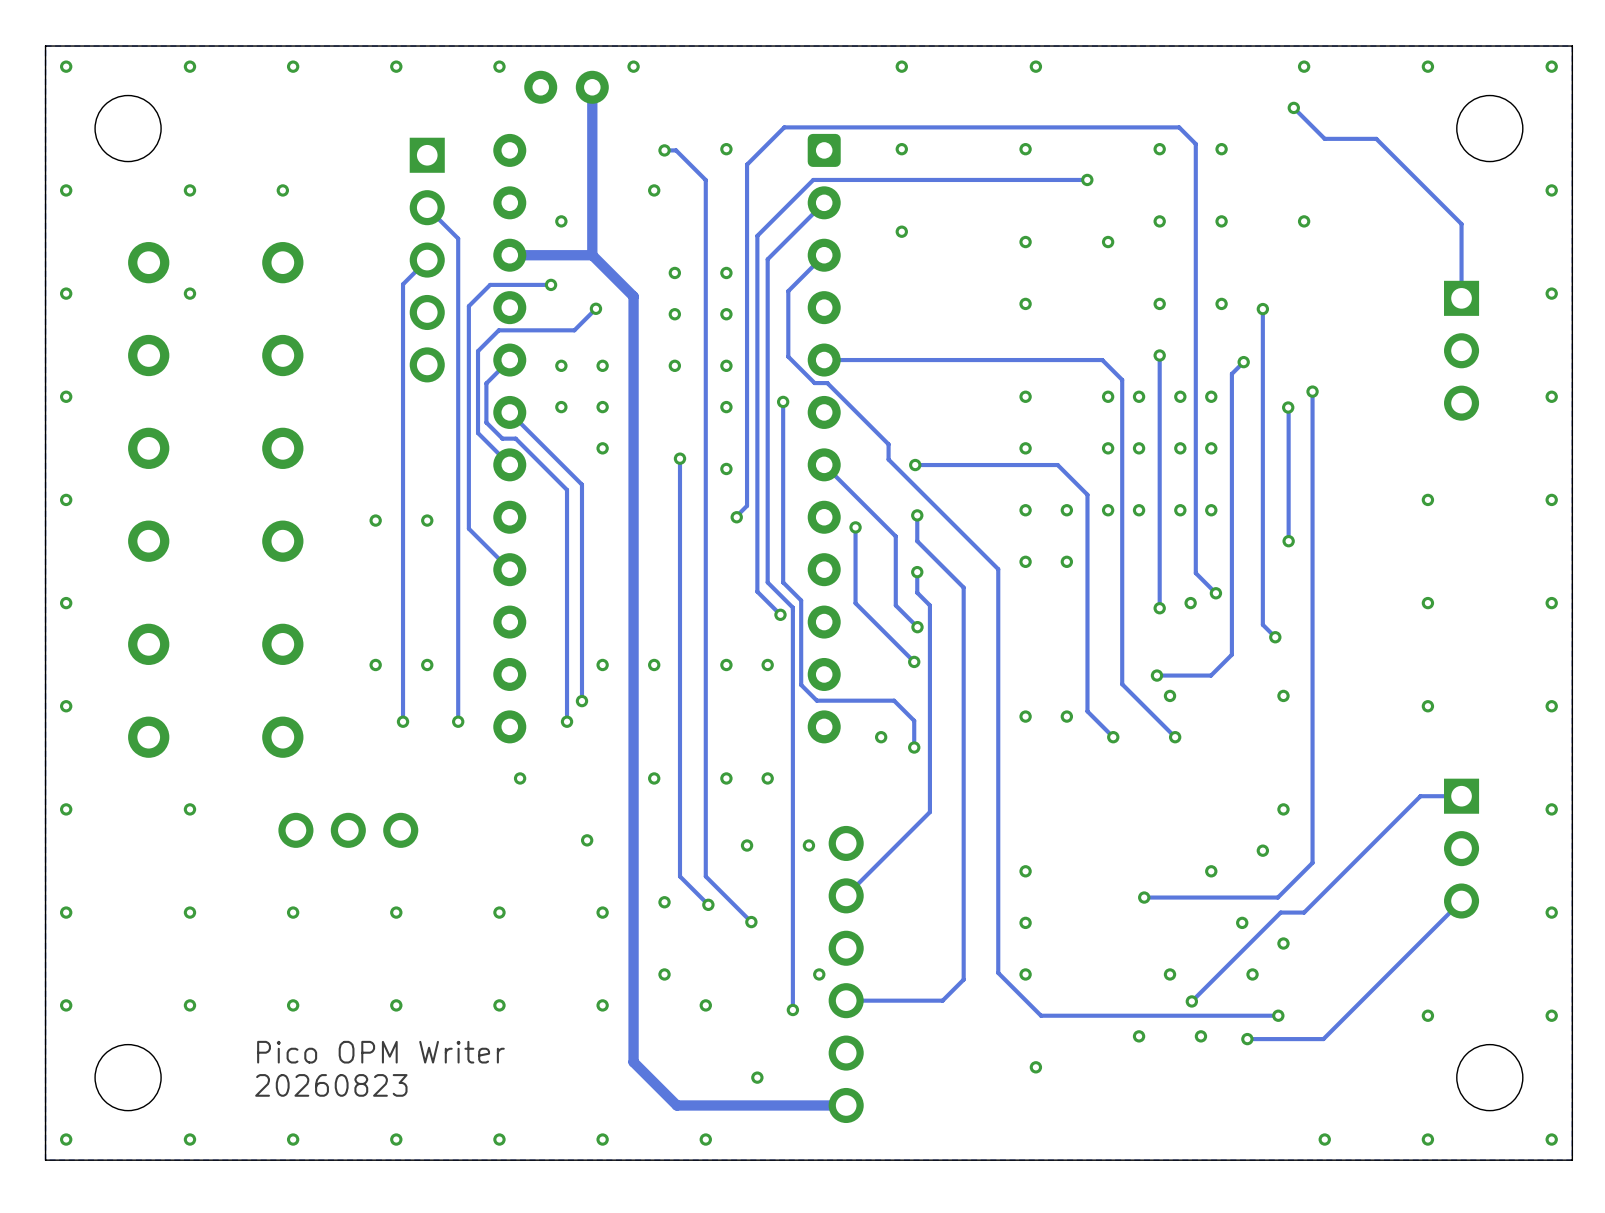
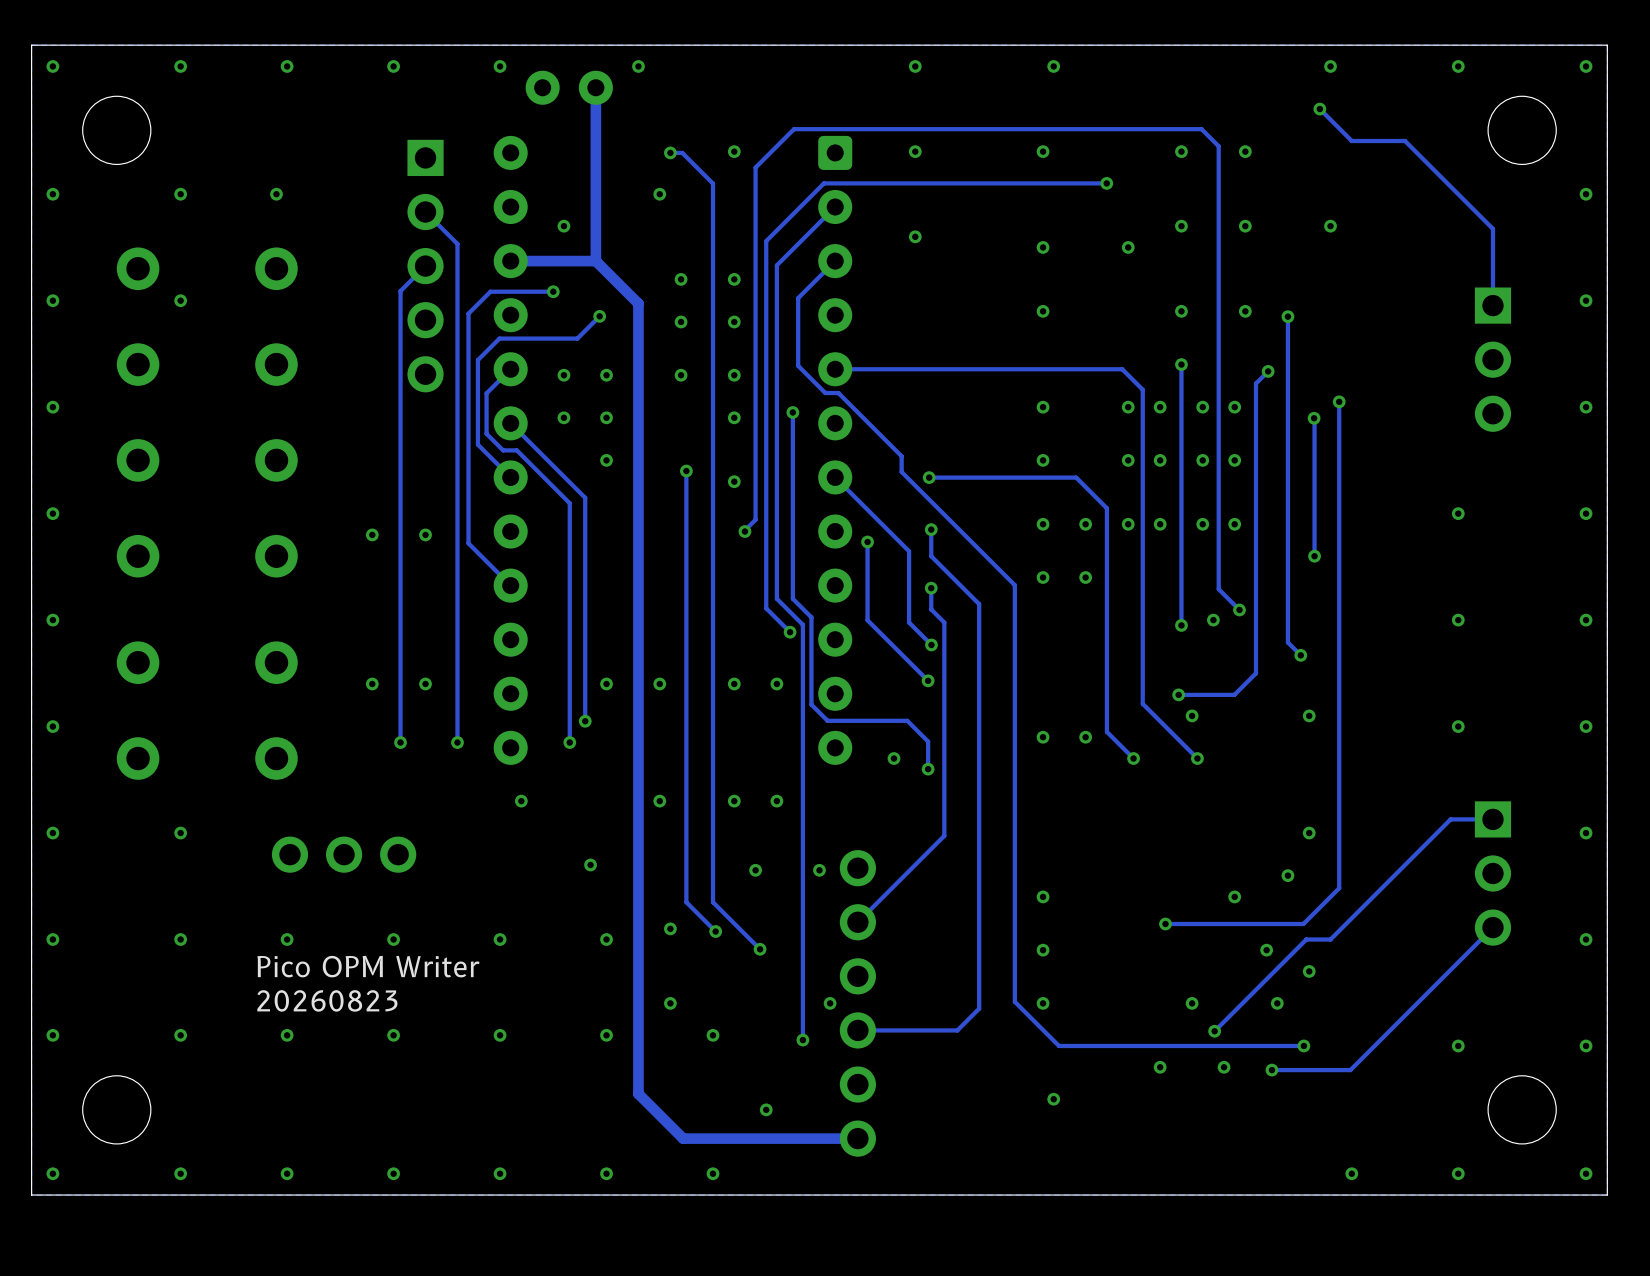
text position: Pico OPM Writer (380, 1052) -> Pico OPM Writer (368, 966)
text position: 20260823 (331, 1085) -> 20260823 (327, 1000)

